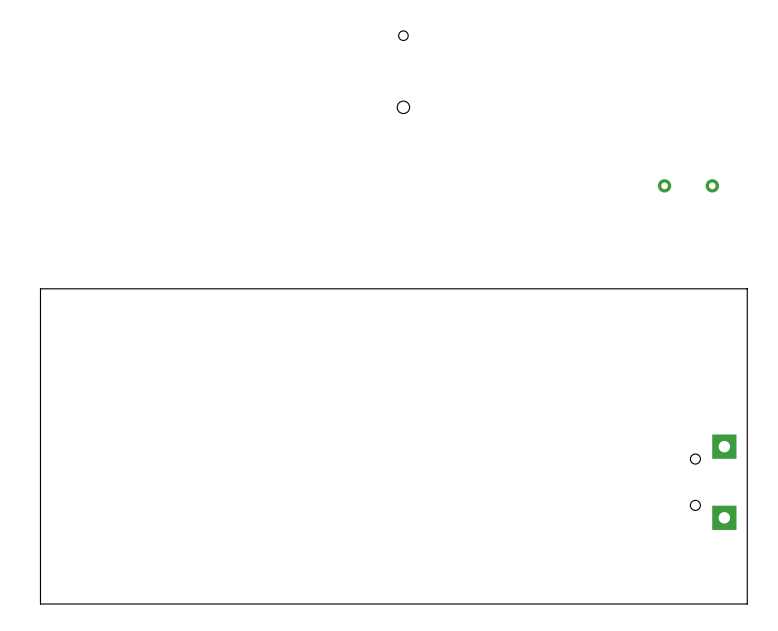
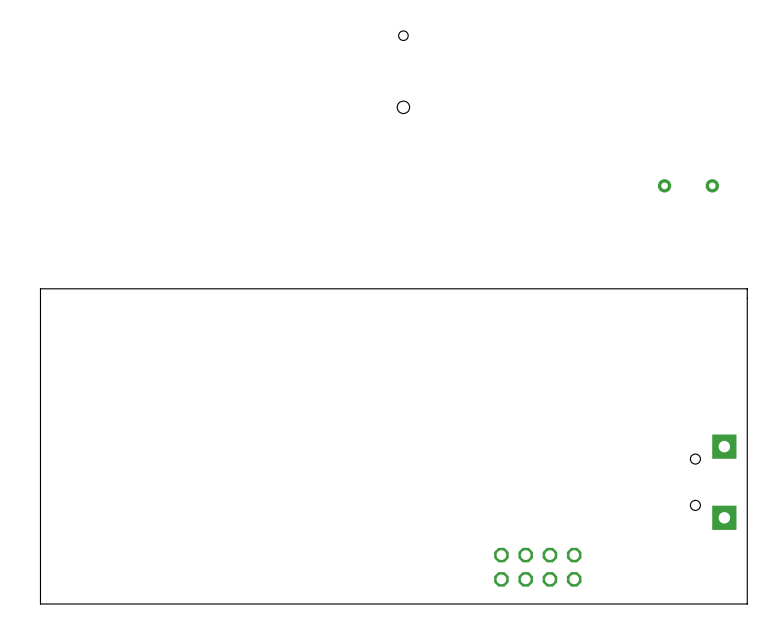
part: none -> (537, 567)

